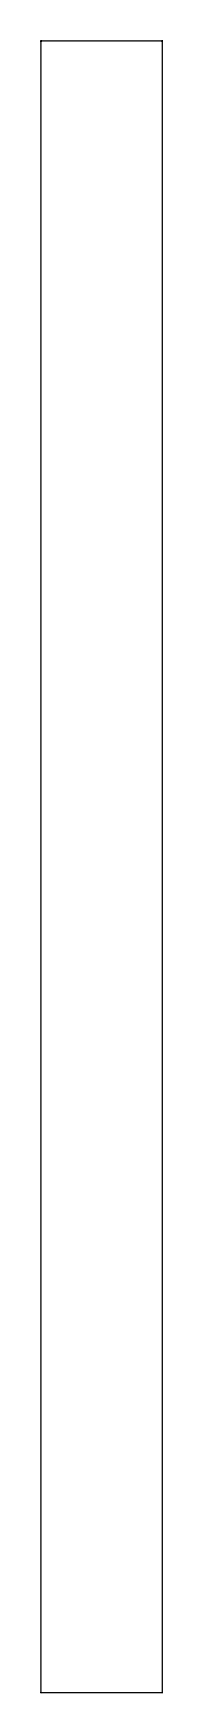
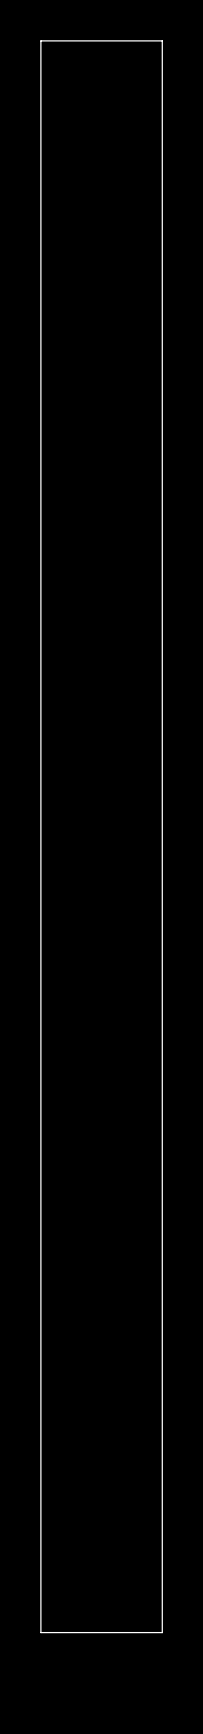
board edge: (40, 1632) (40, 1692) (162, 1692) (162, 1632) -> (40, 1632) (162, 1632)

